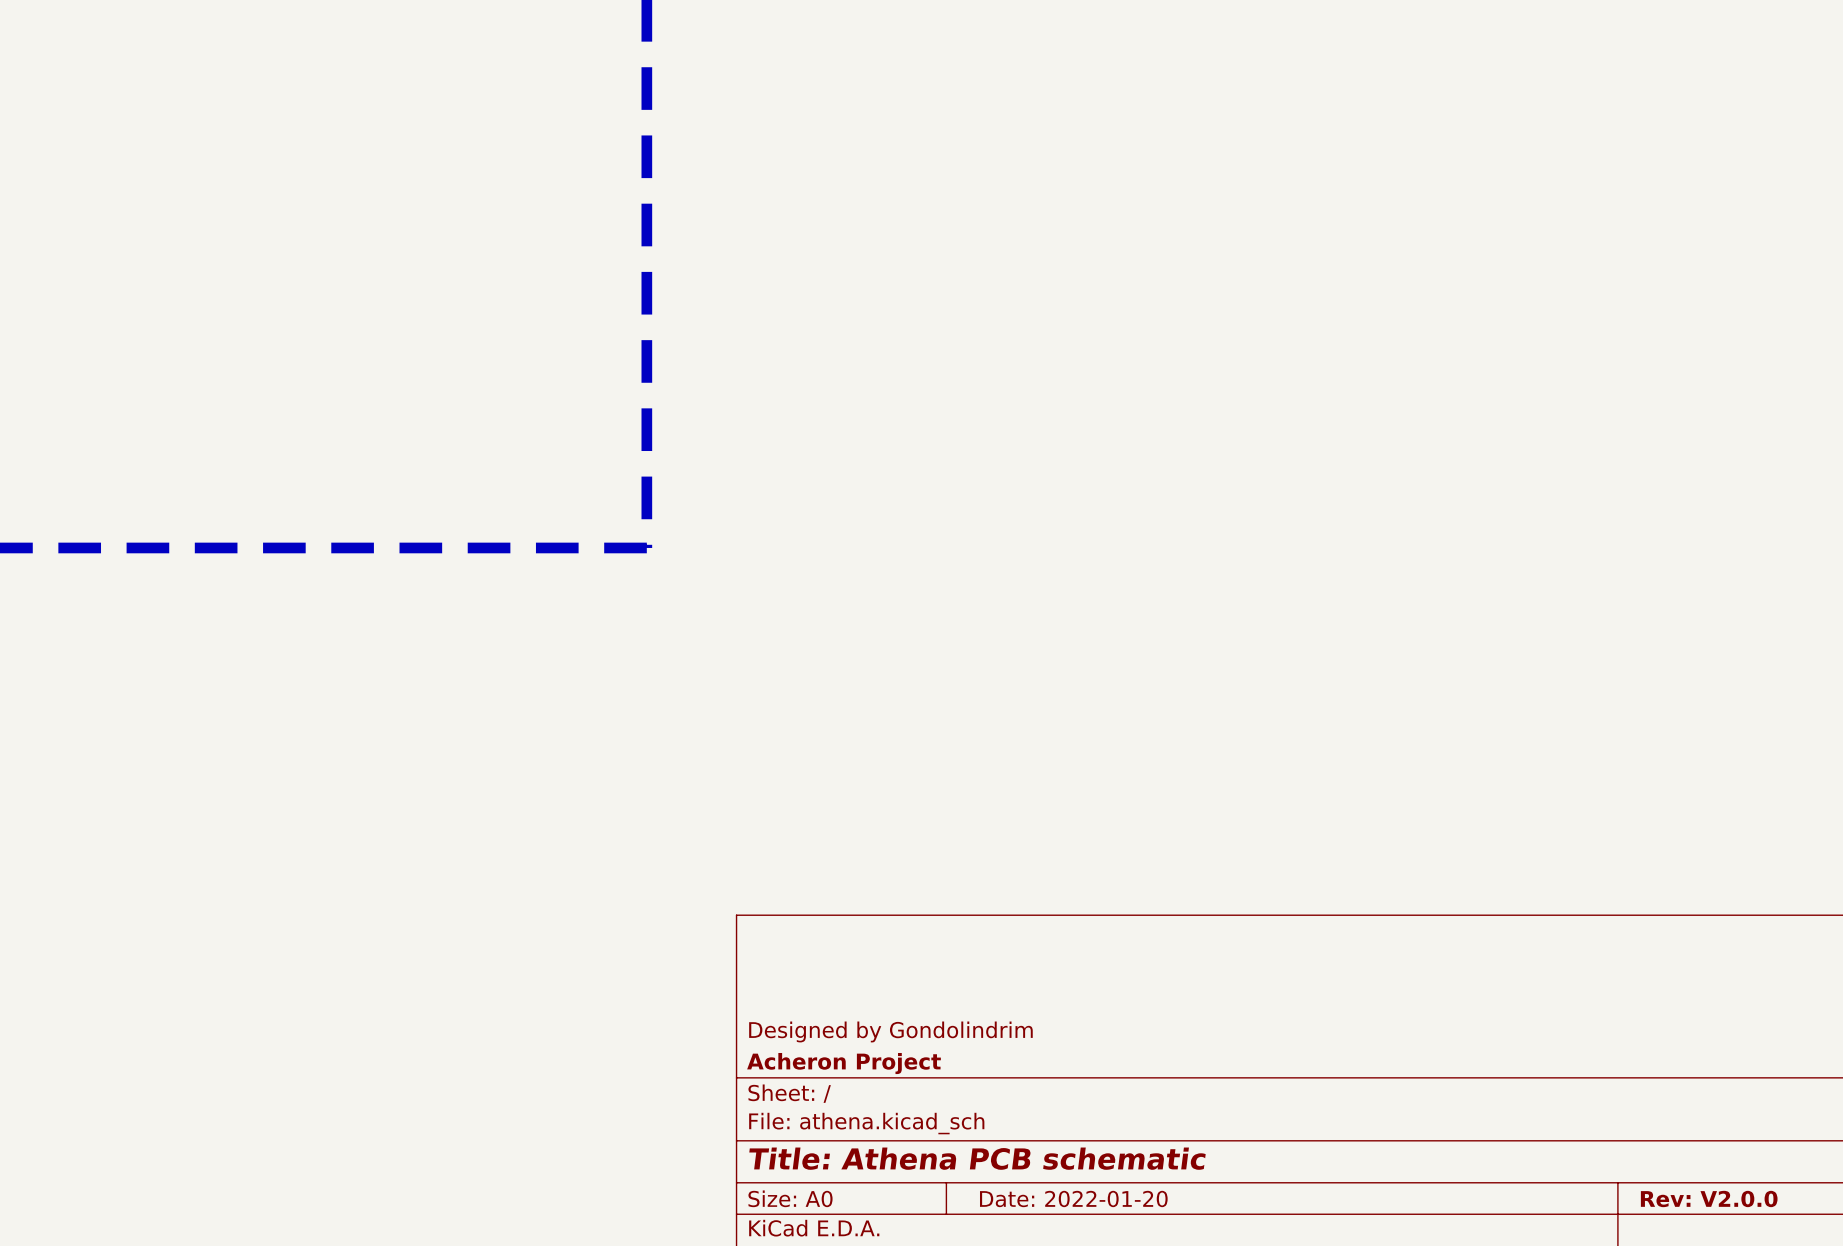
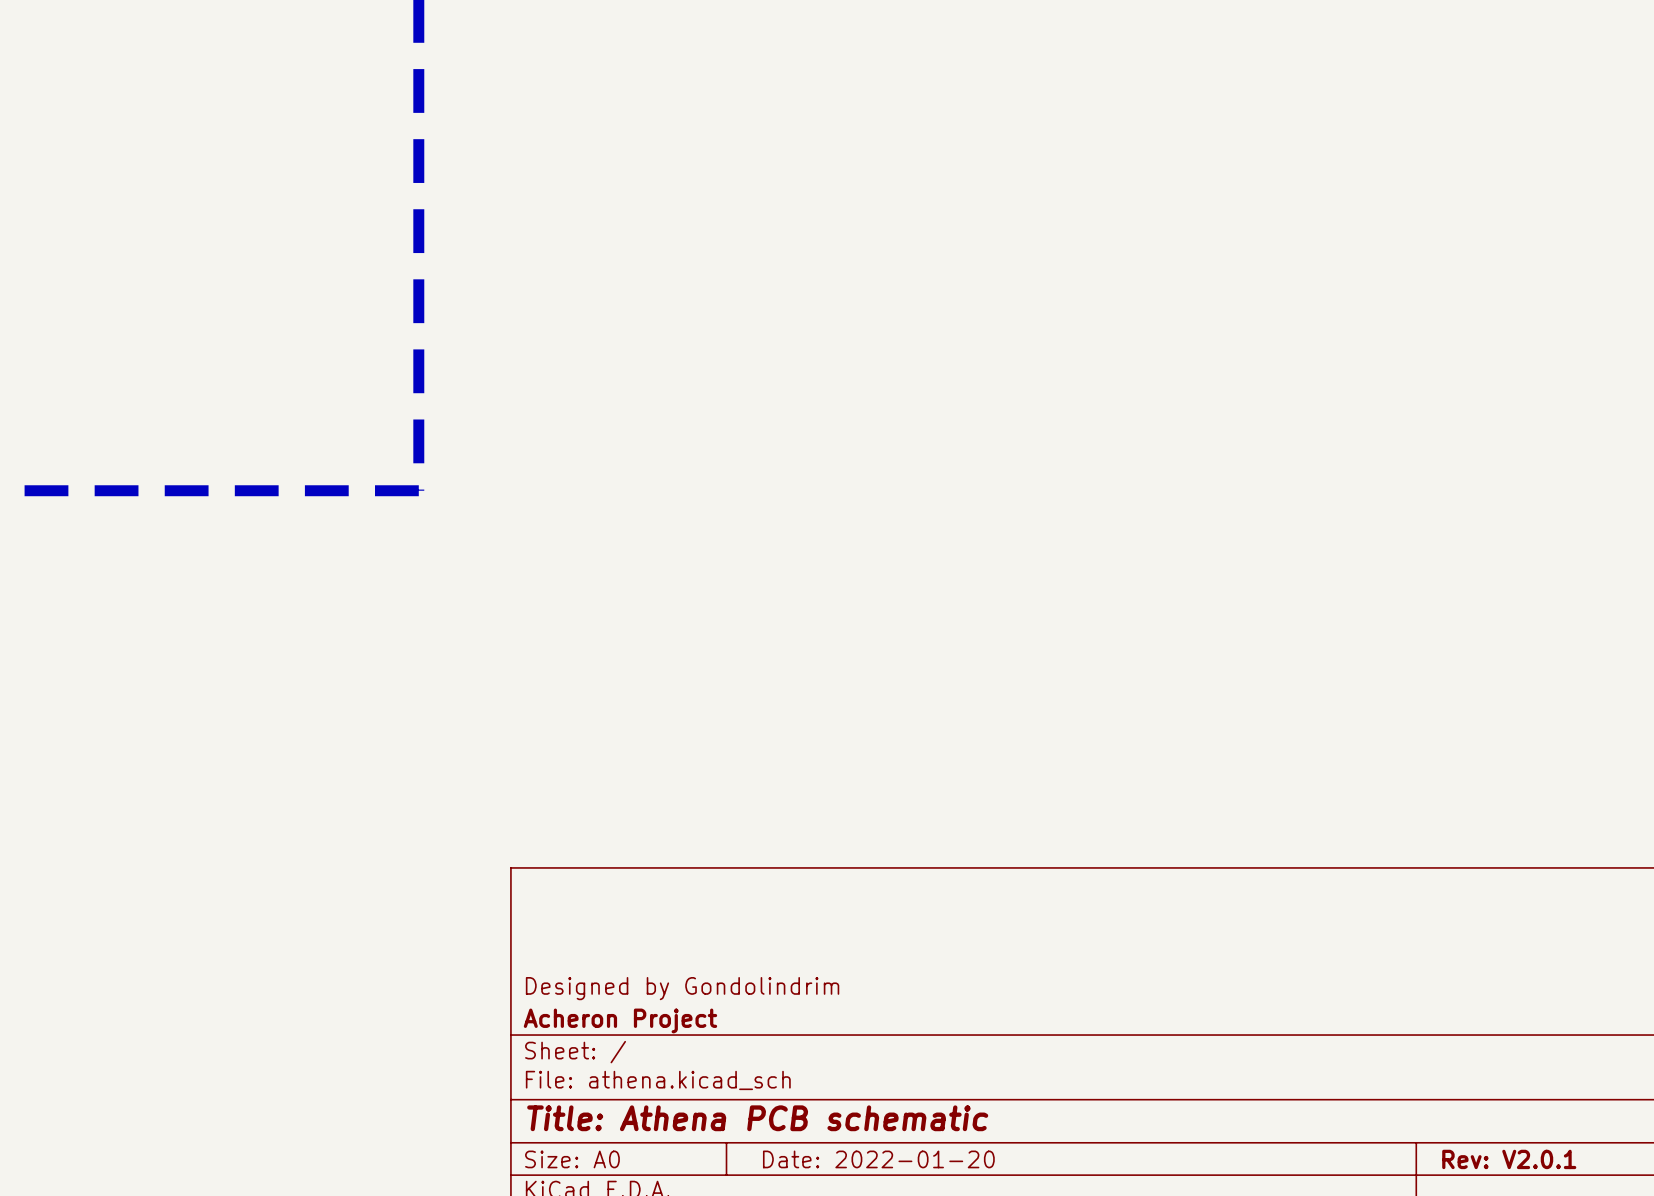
title block: Rev: V2.0.0 (1709, 1198) -> Rev: V2.0.1 (1509, 1159)

